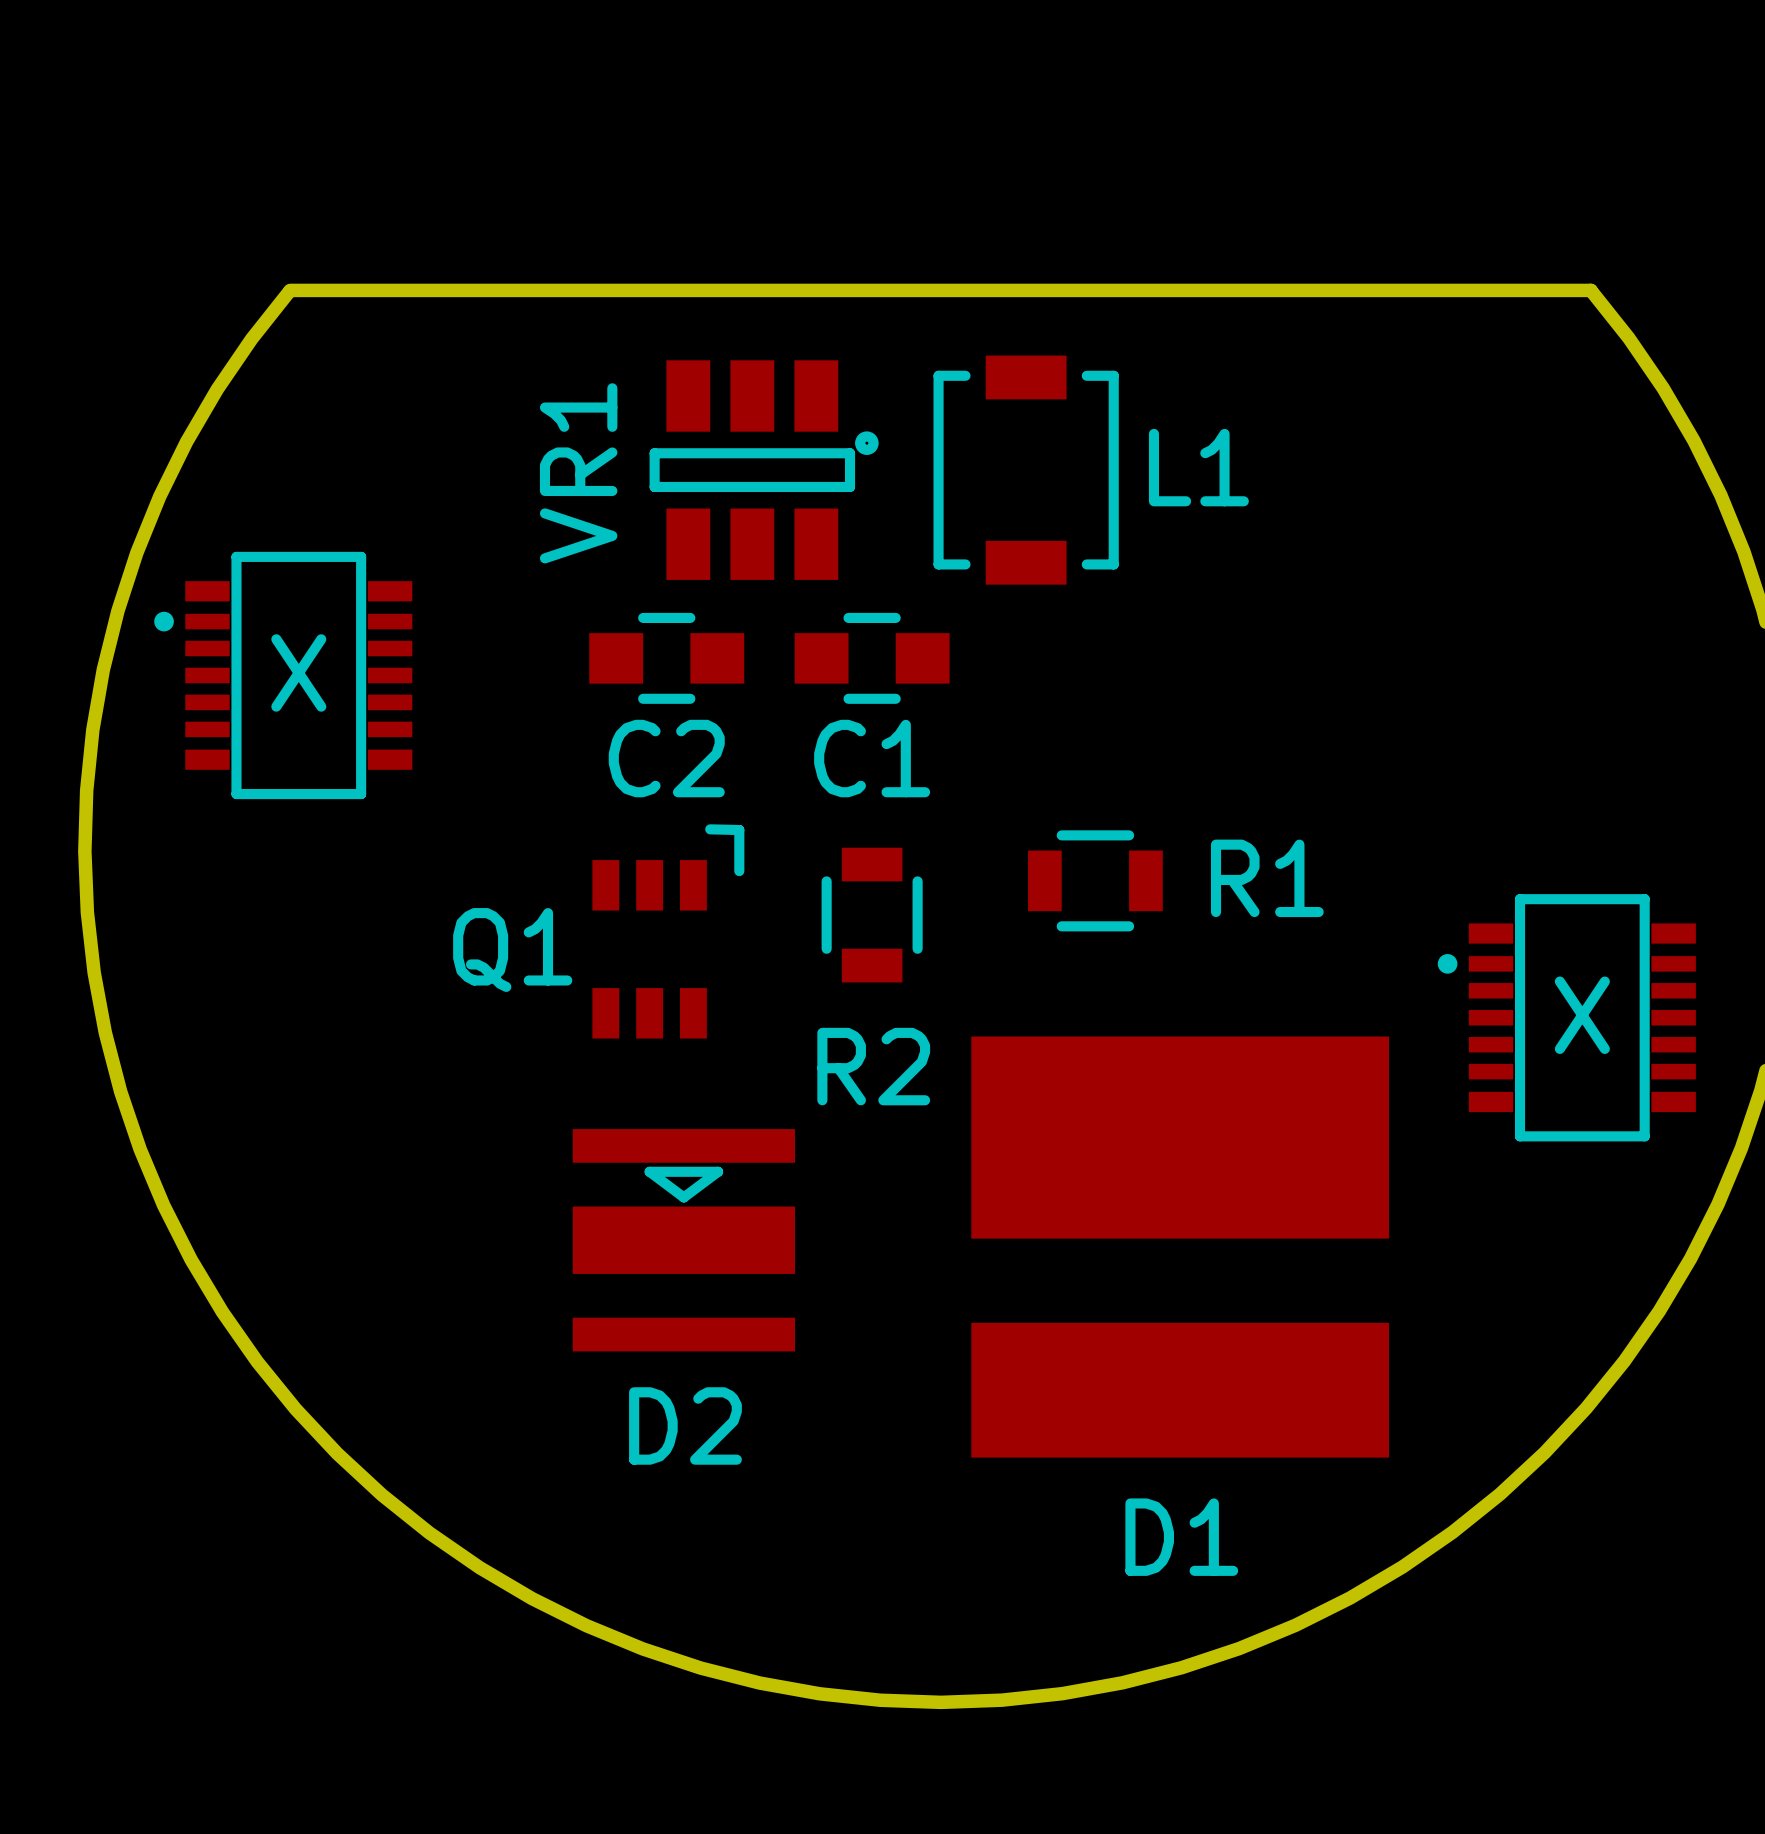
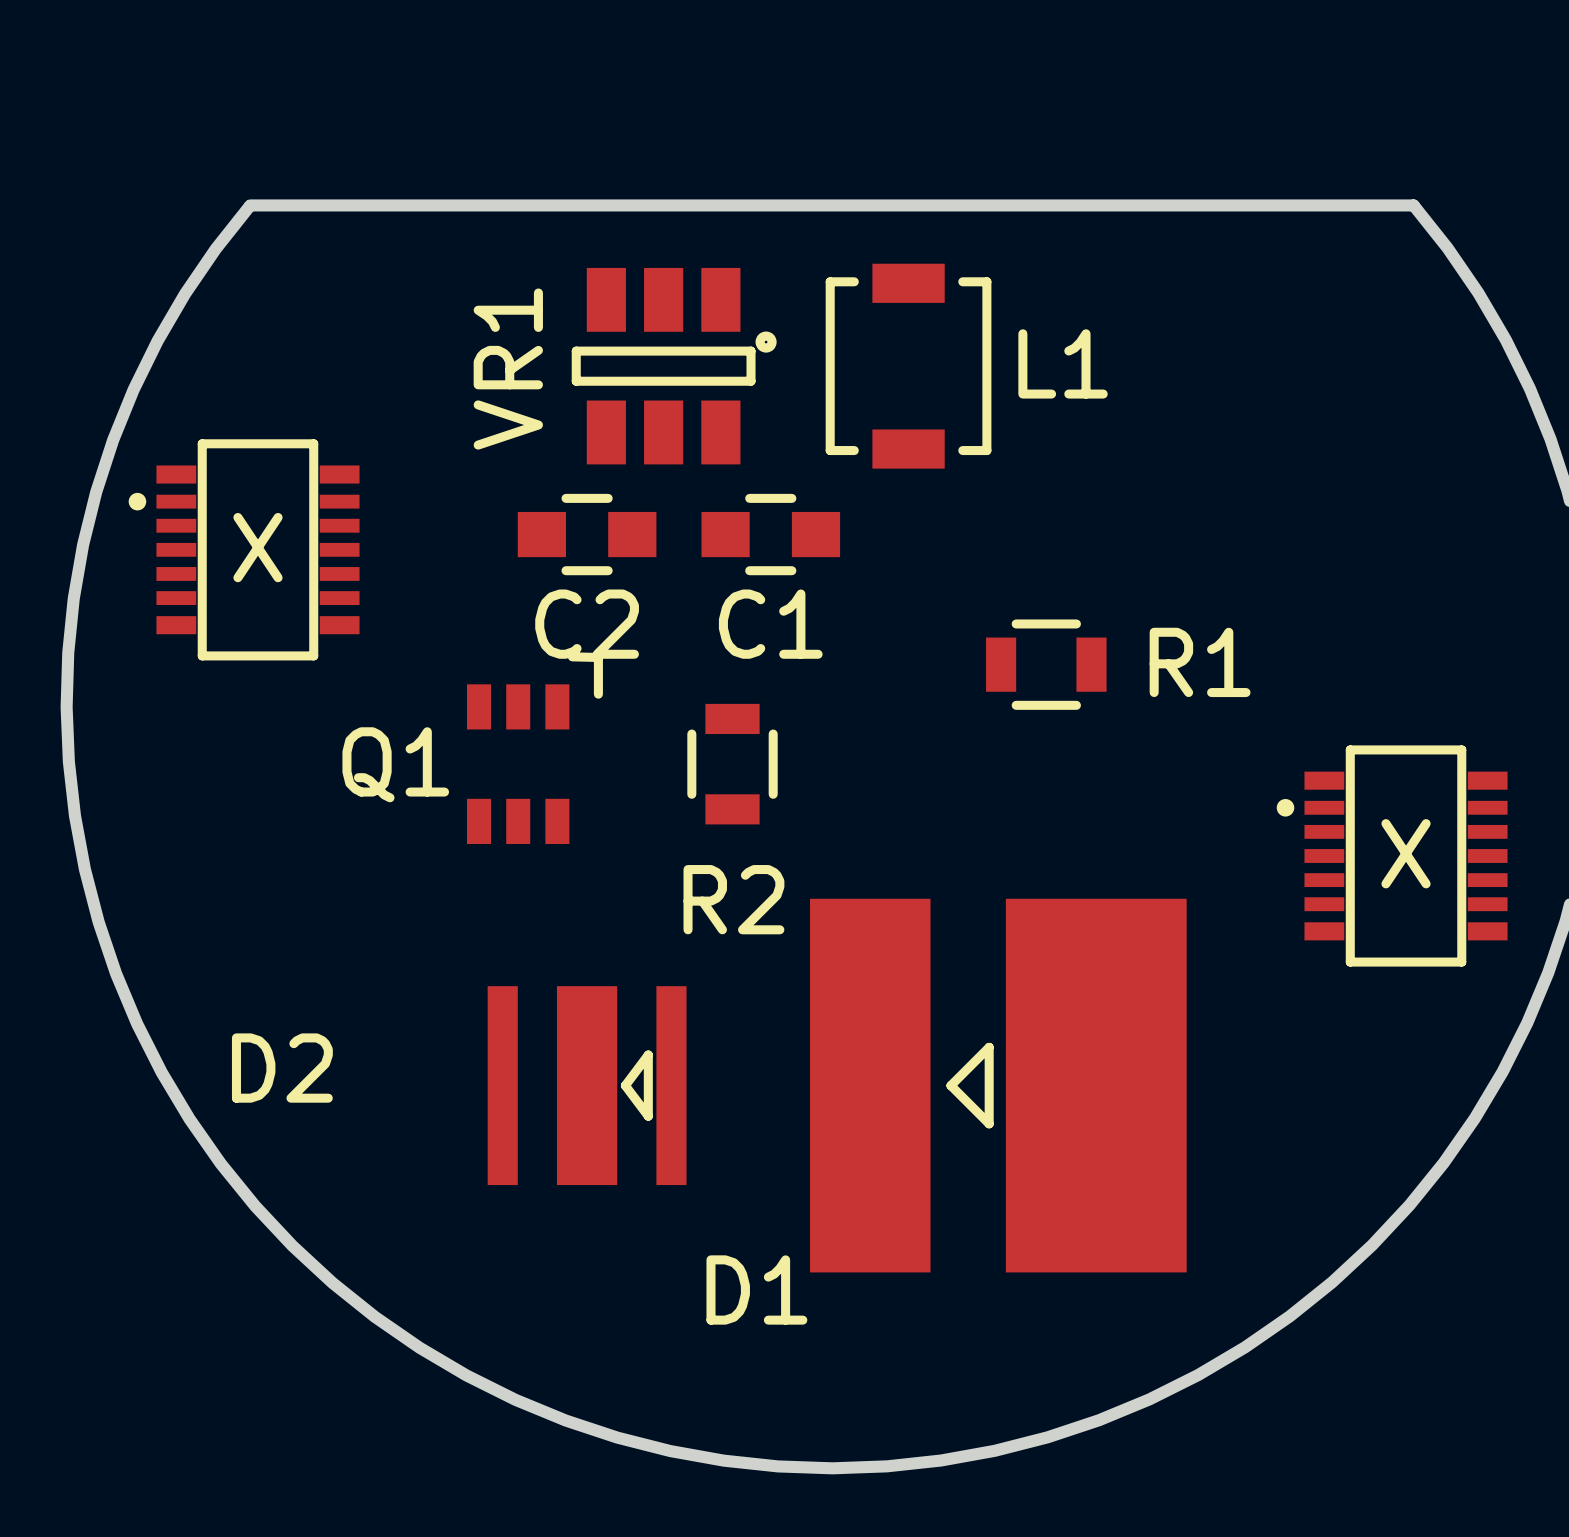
R1 position: (1095, 880) -> (1046, 664)
R2 position: (872, 915) -> (732, 764)
Q1 position: (668, 931) -> (534, 748)
D1 footprint: [971, 1036, 1390, 1458] -> [810, 898, 1187, 1273]
D2 rotation: 0° (683, 1240) -> 90° clockwise (587, 1085)
D2 name position: D2 (685, 1425) -> D2 (282, 1068)
D1 name position: D1 (1181, 1537) -> D1 (756, 1290)

